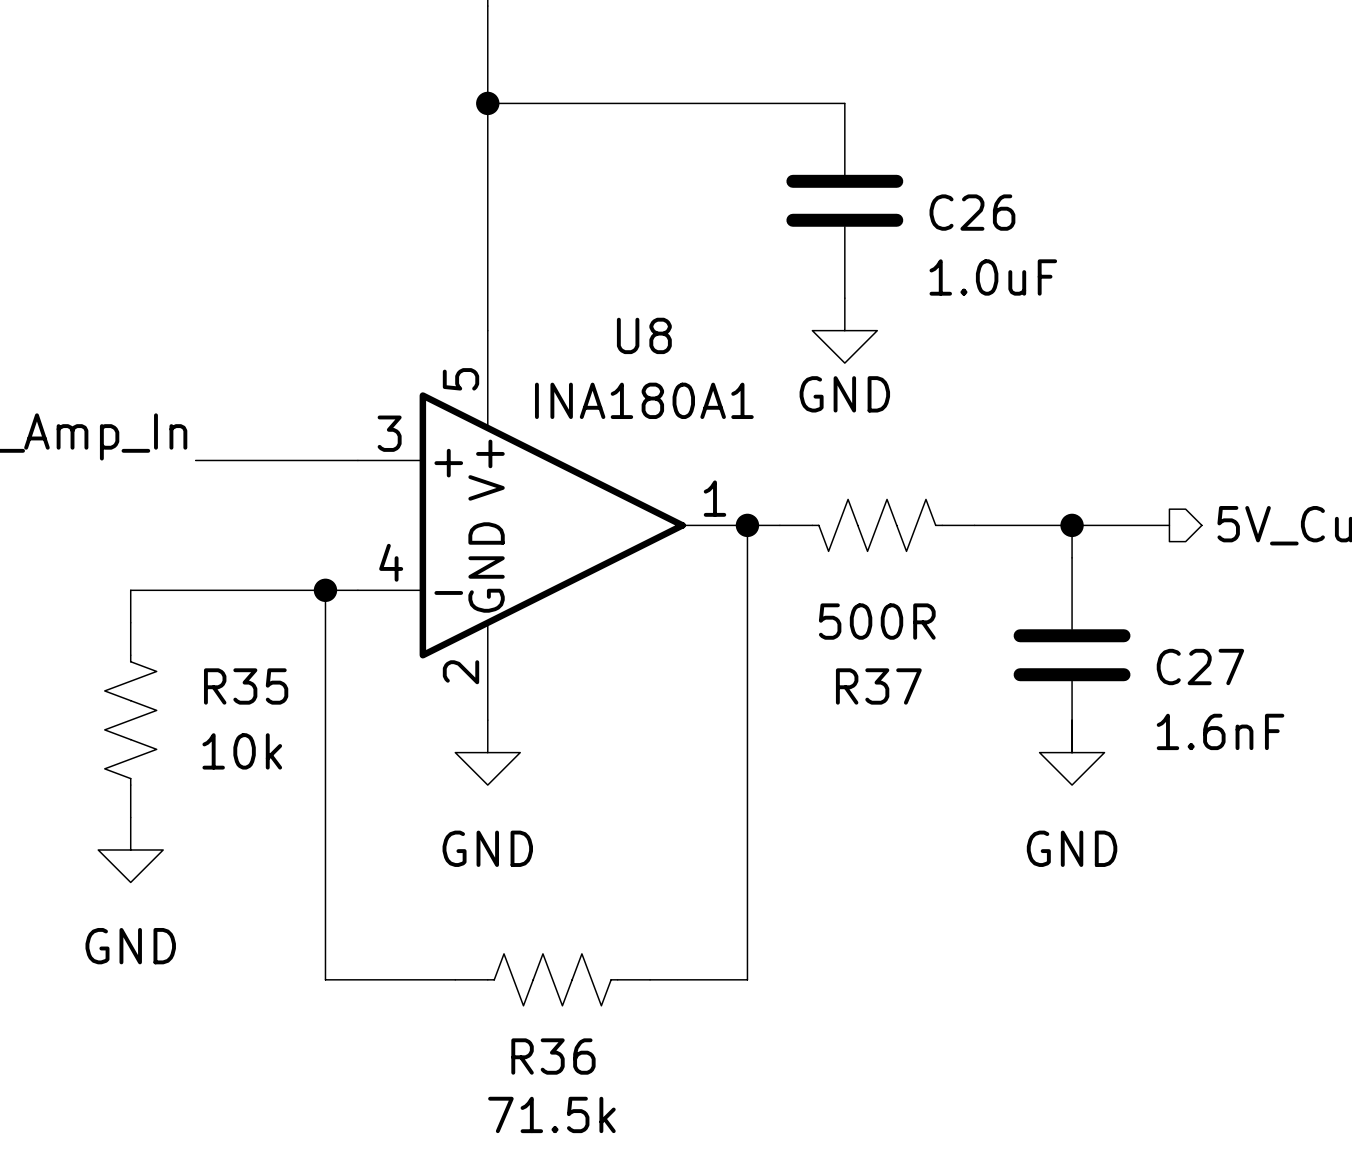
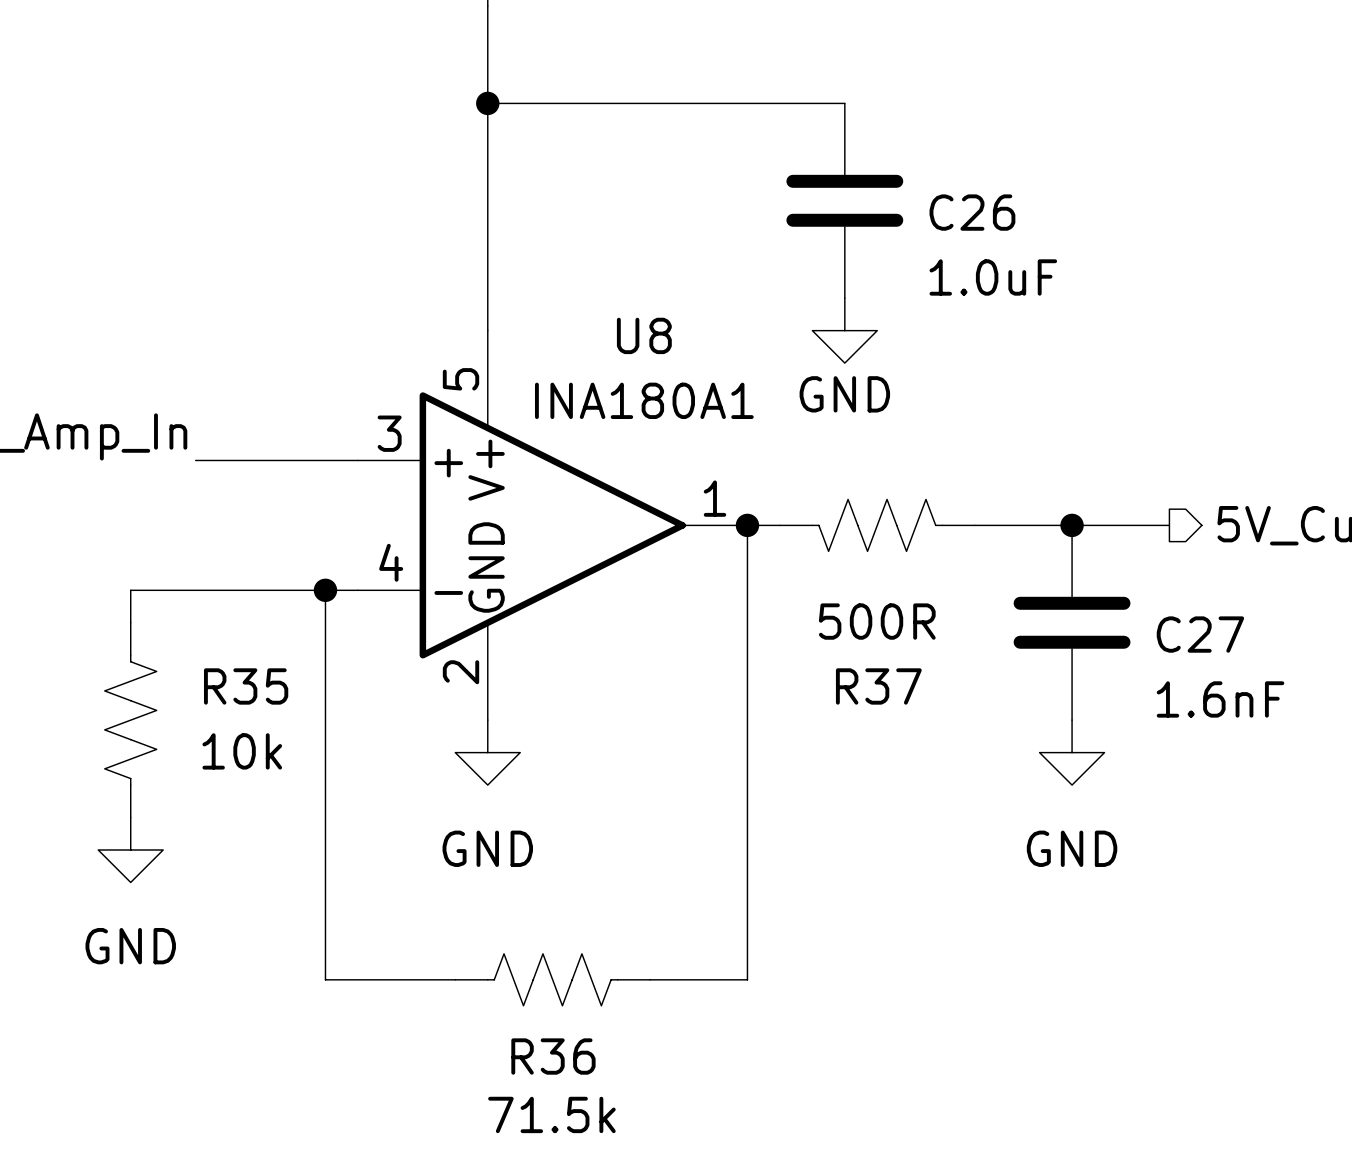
C27 position: (1072, 655) -> (1072, 622)

